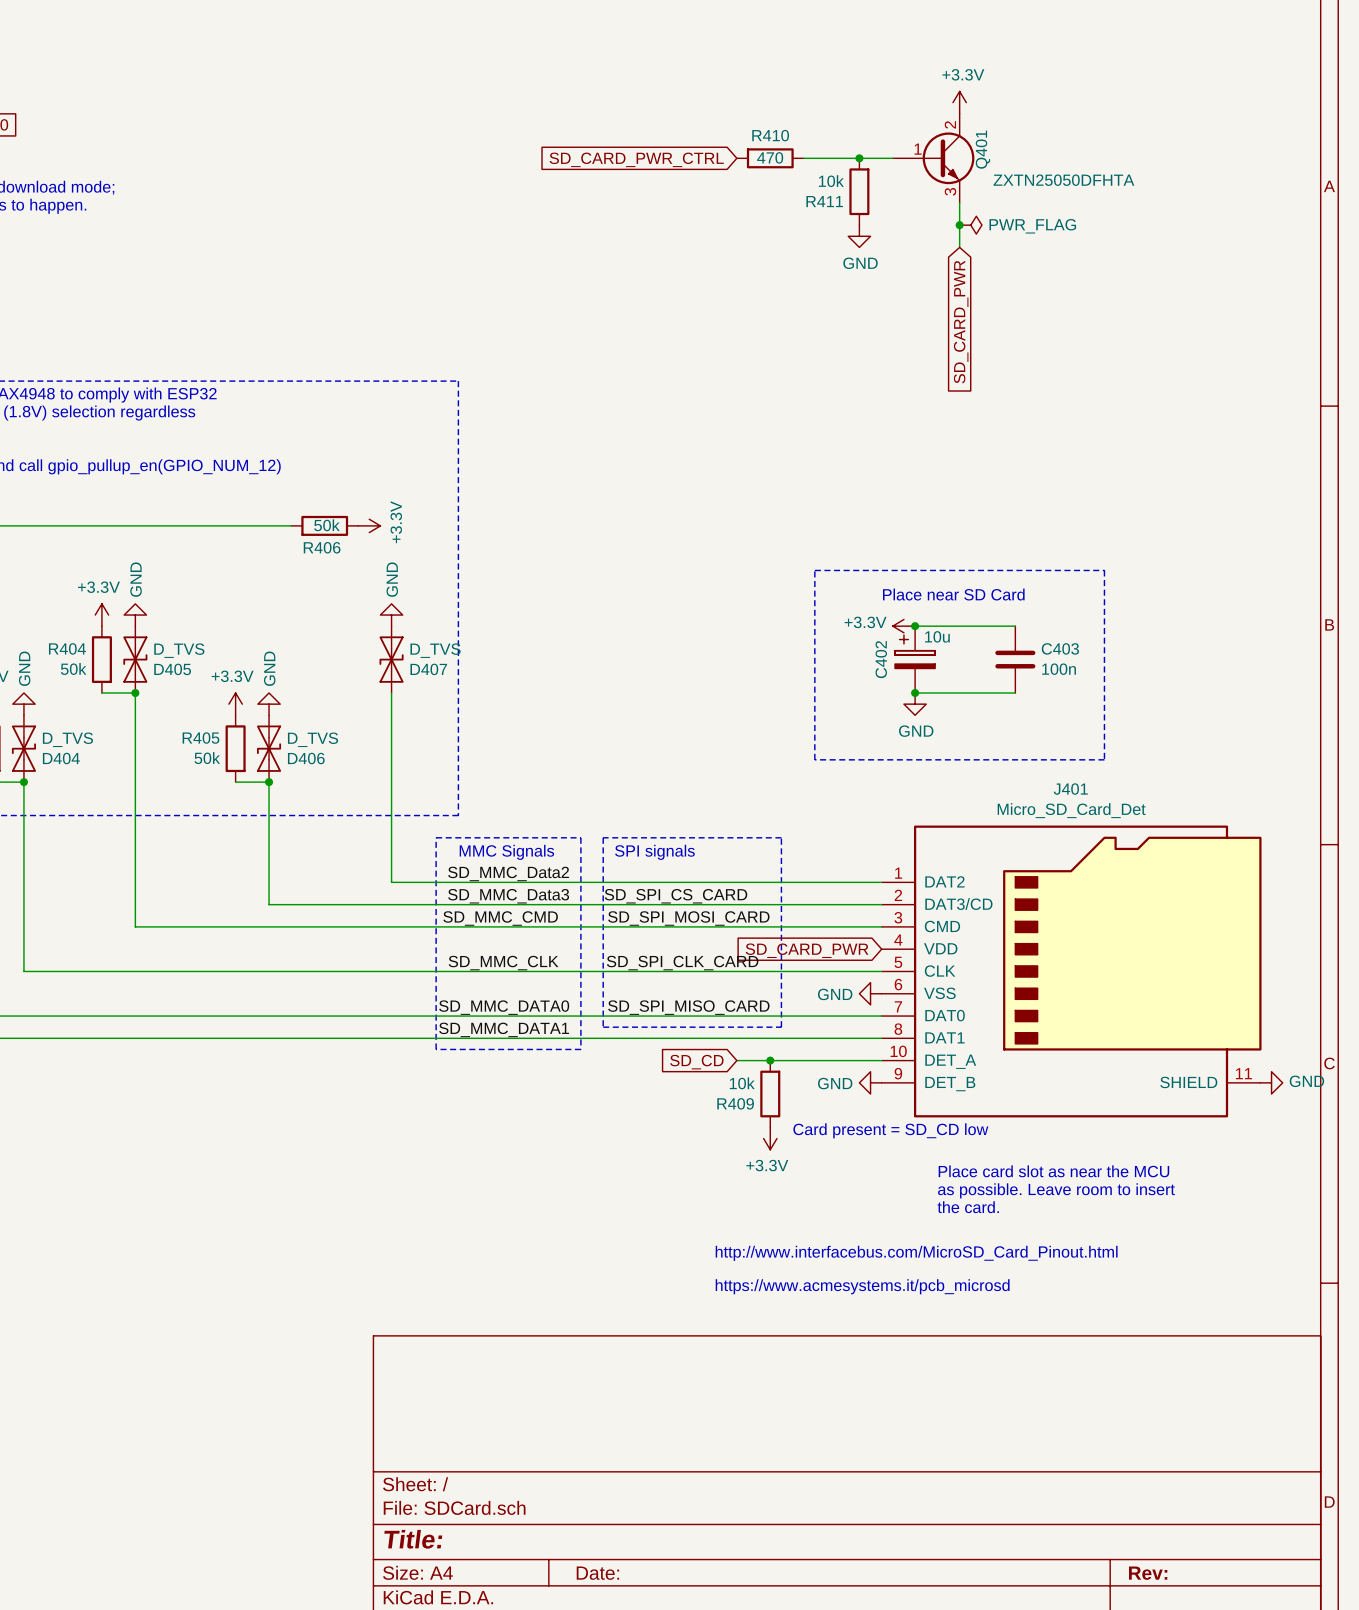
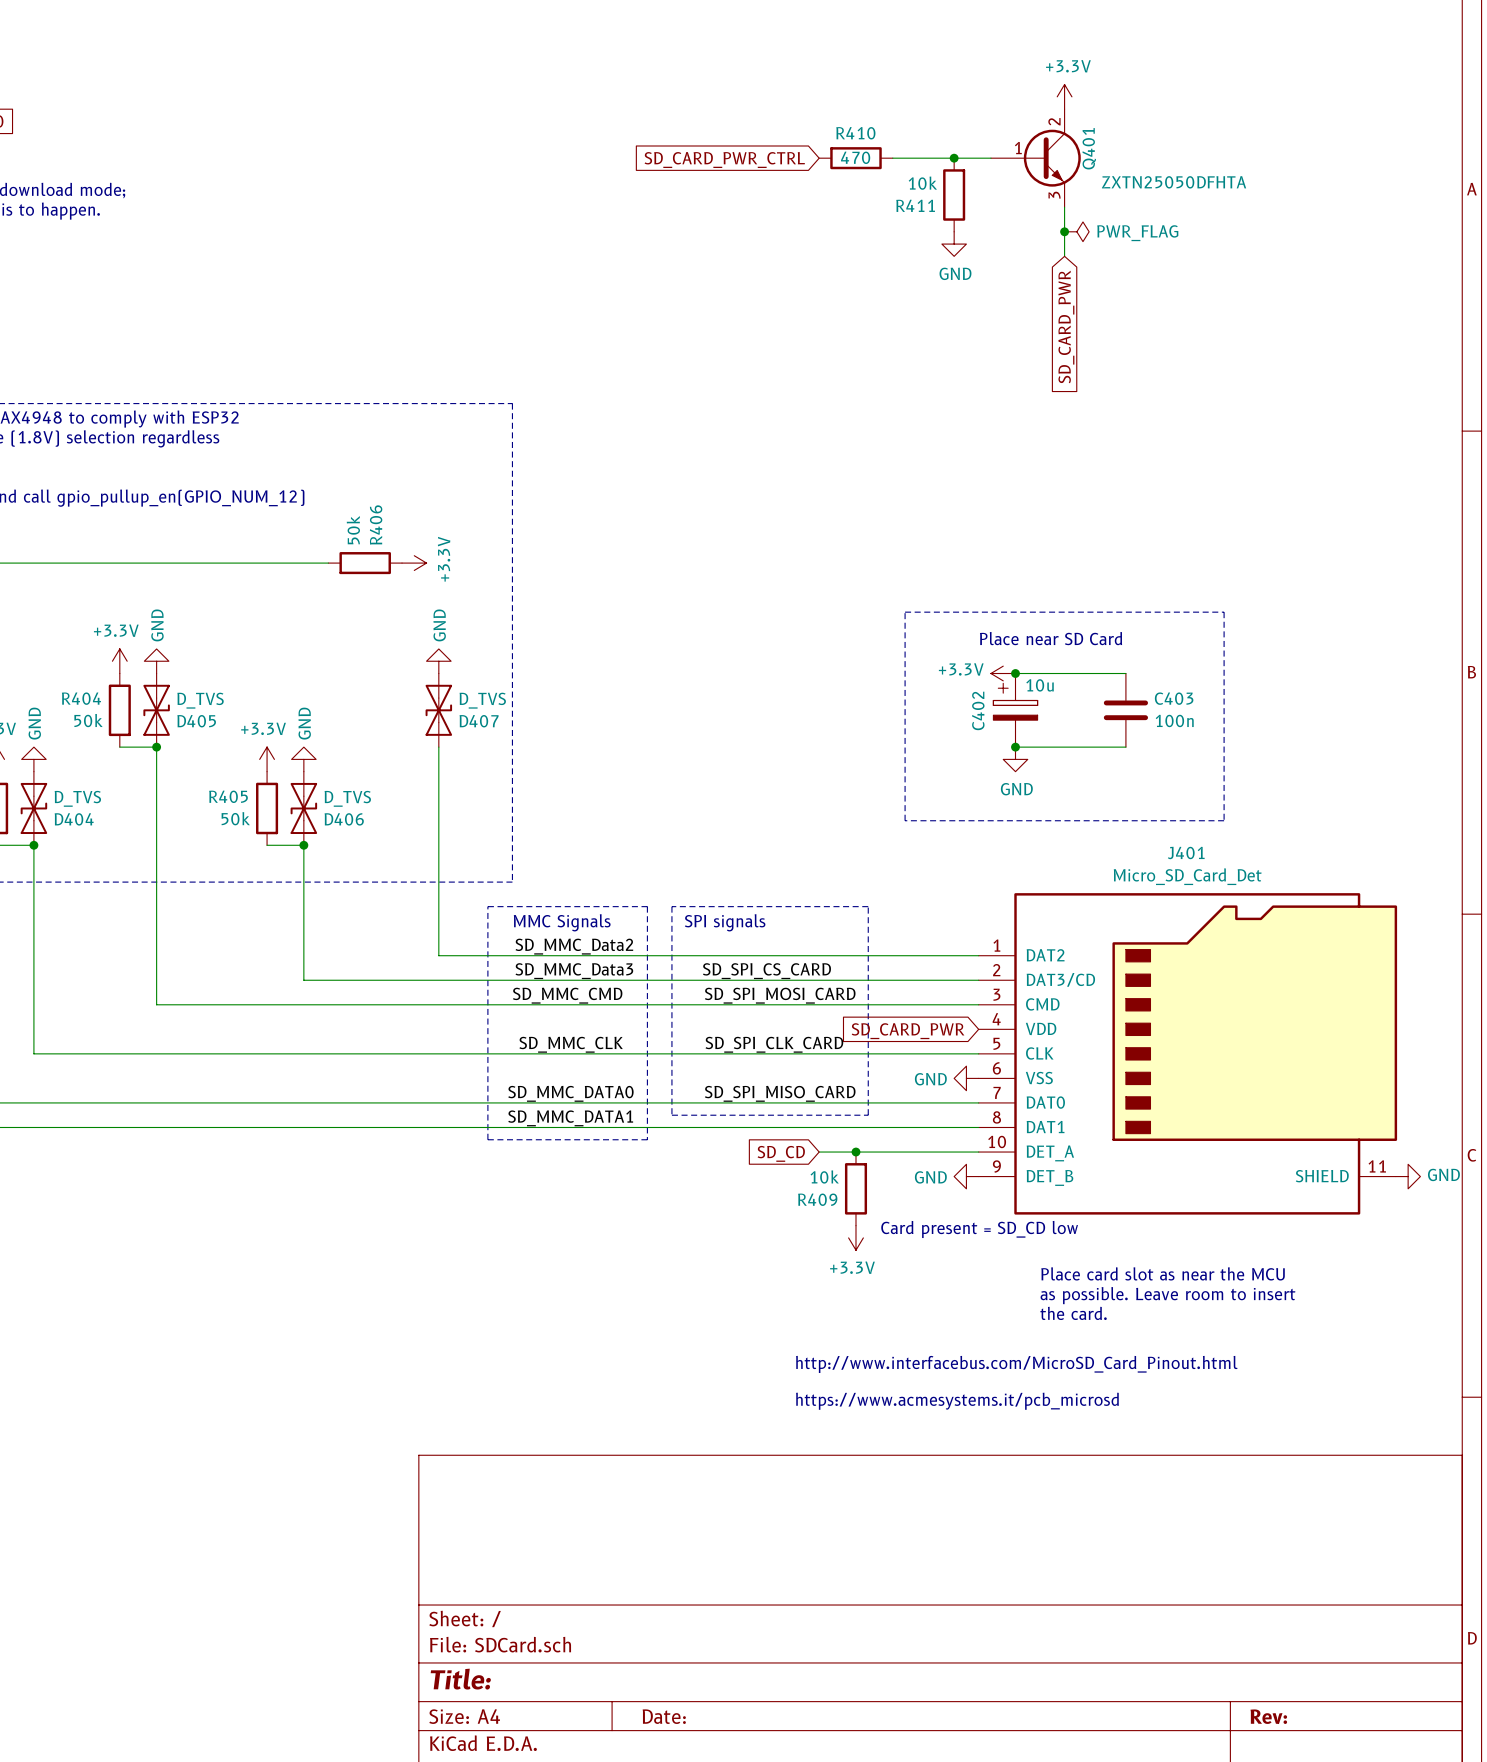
R406 value rotation: 0° (326, 525) -> 90° counterclockwise (353, 530)
R406 value position: 50k (326, 525) -> 50k (353, 530)
R406 name rotation: 0° (322, 547) -> 90° counterclockwise (376, 524)
R406 name position: R406 (322, 547) -> R406 (376, 524)

